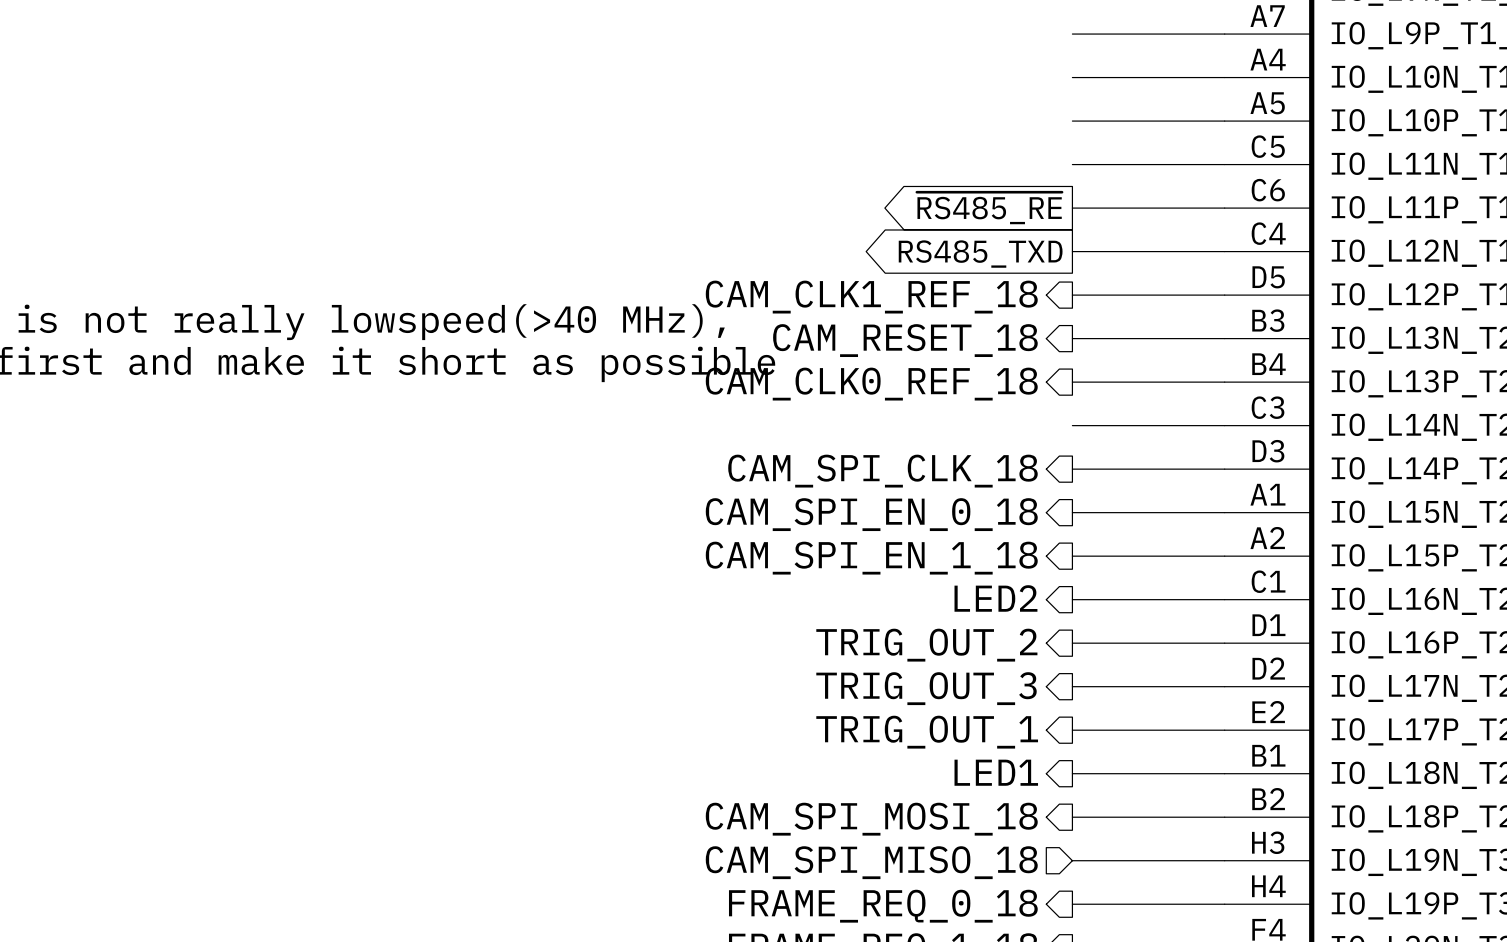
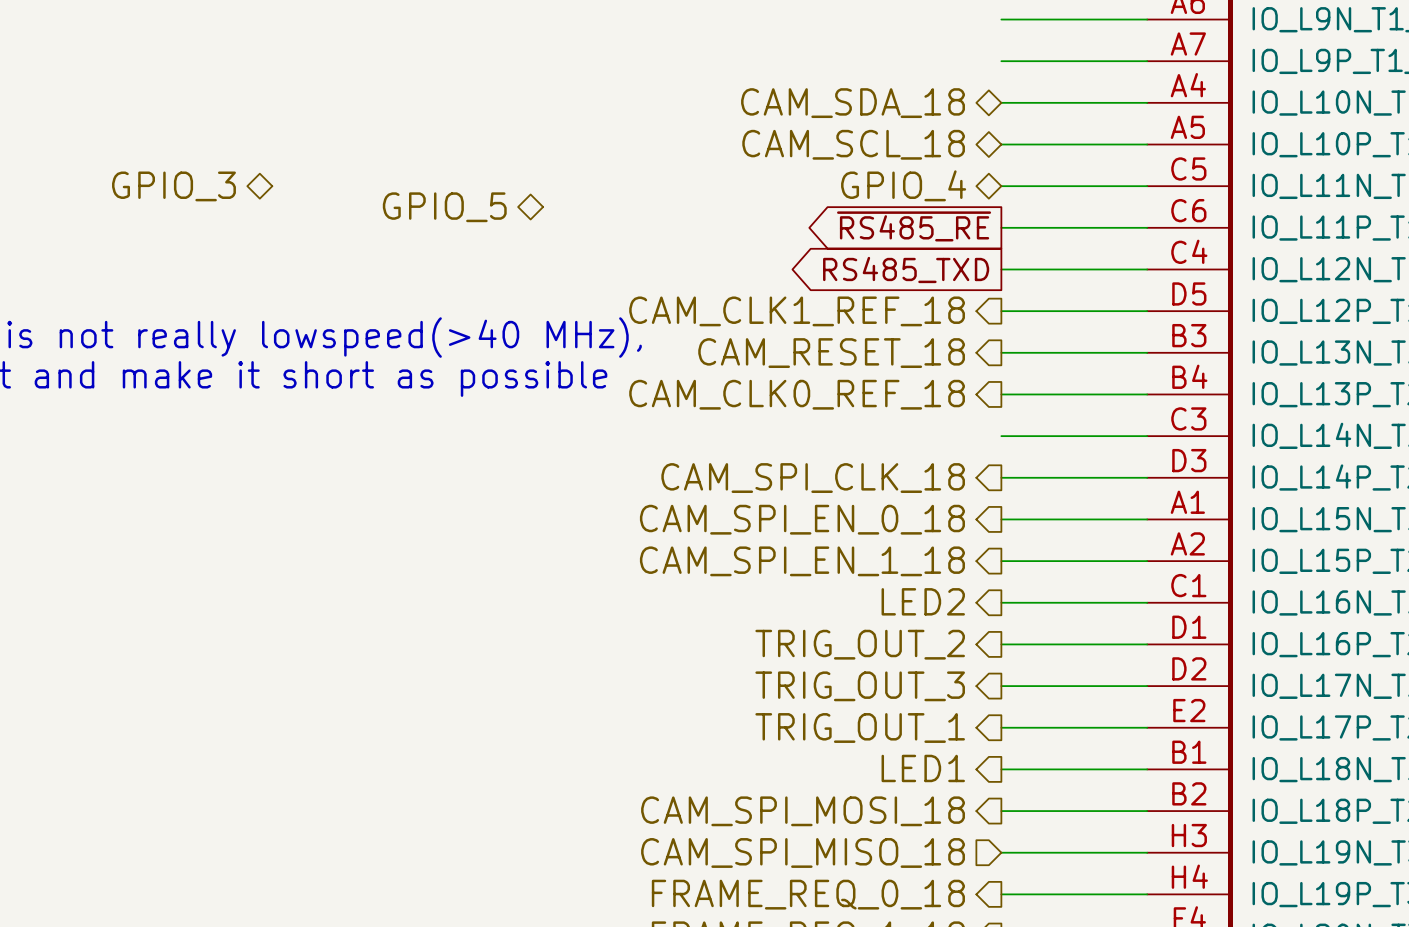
hierarchical label: none -> CAM_SDA_18 (853, 103)
hierarchical label: none -> CAM_SCL_18 (853, 144)
hierarchical label: none -> GPIO_3 (173, 186)
hierarchical label: none -> GPIO_4 (903, 185)
hierarchical label: none -> GPIO_5 (444, 207)

